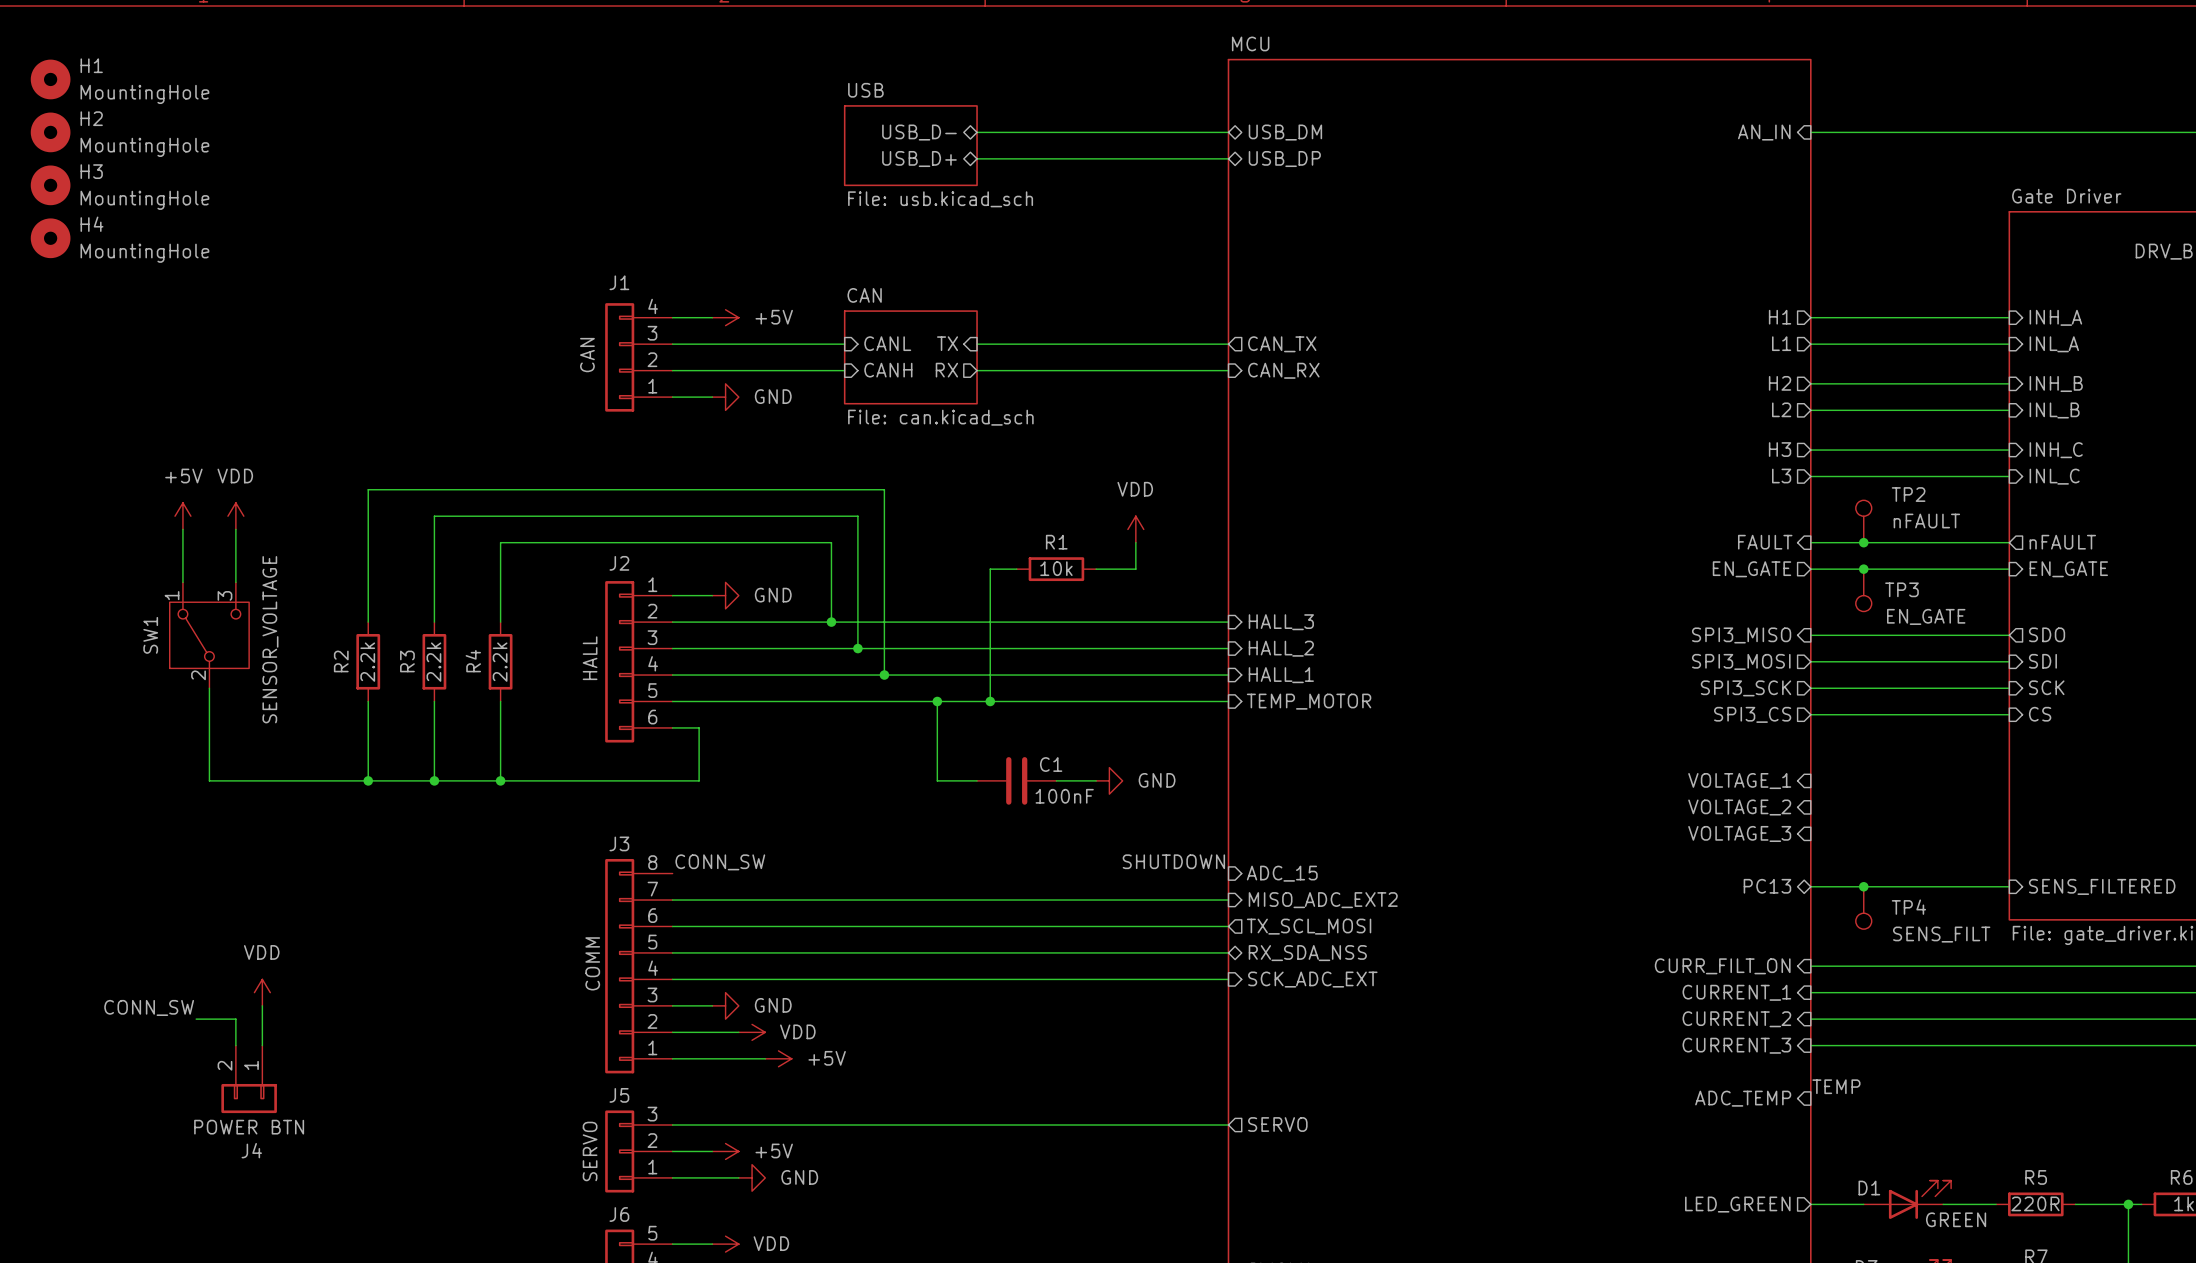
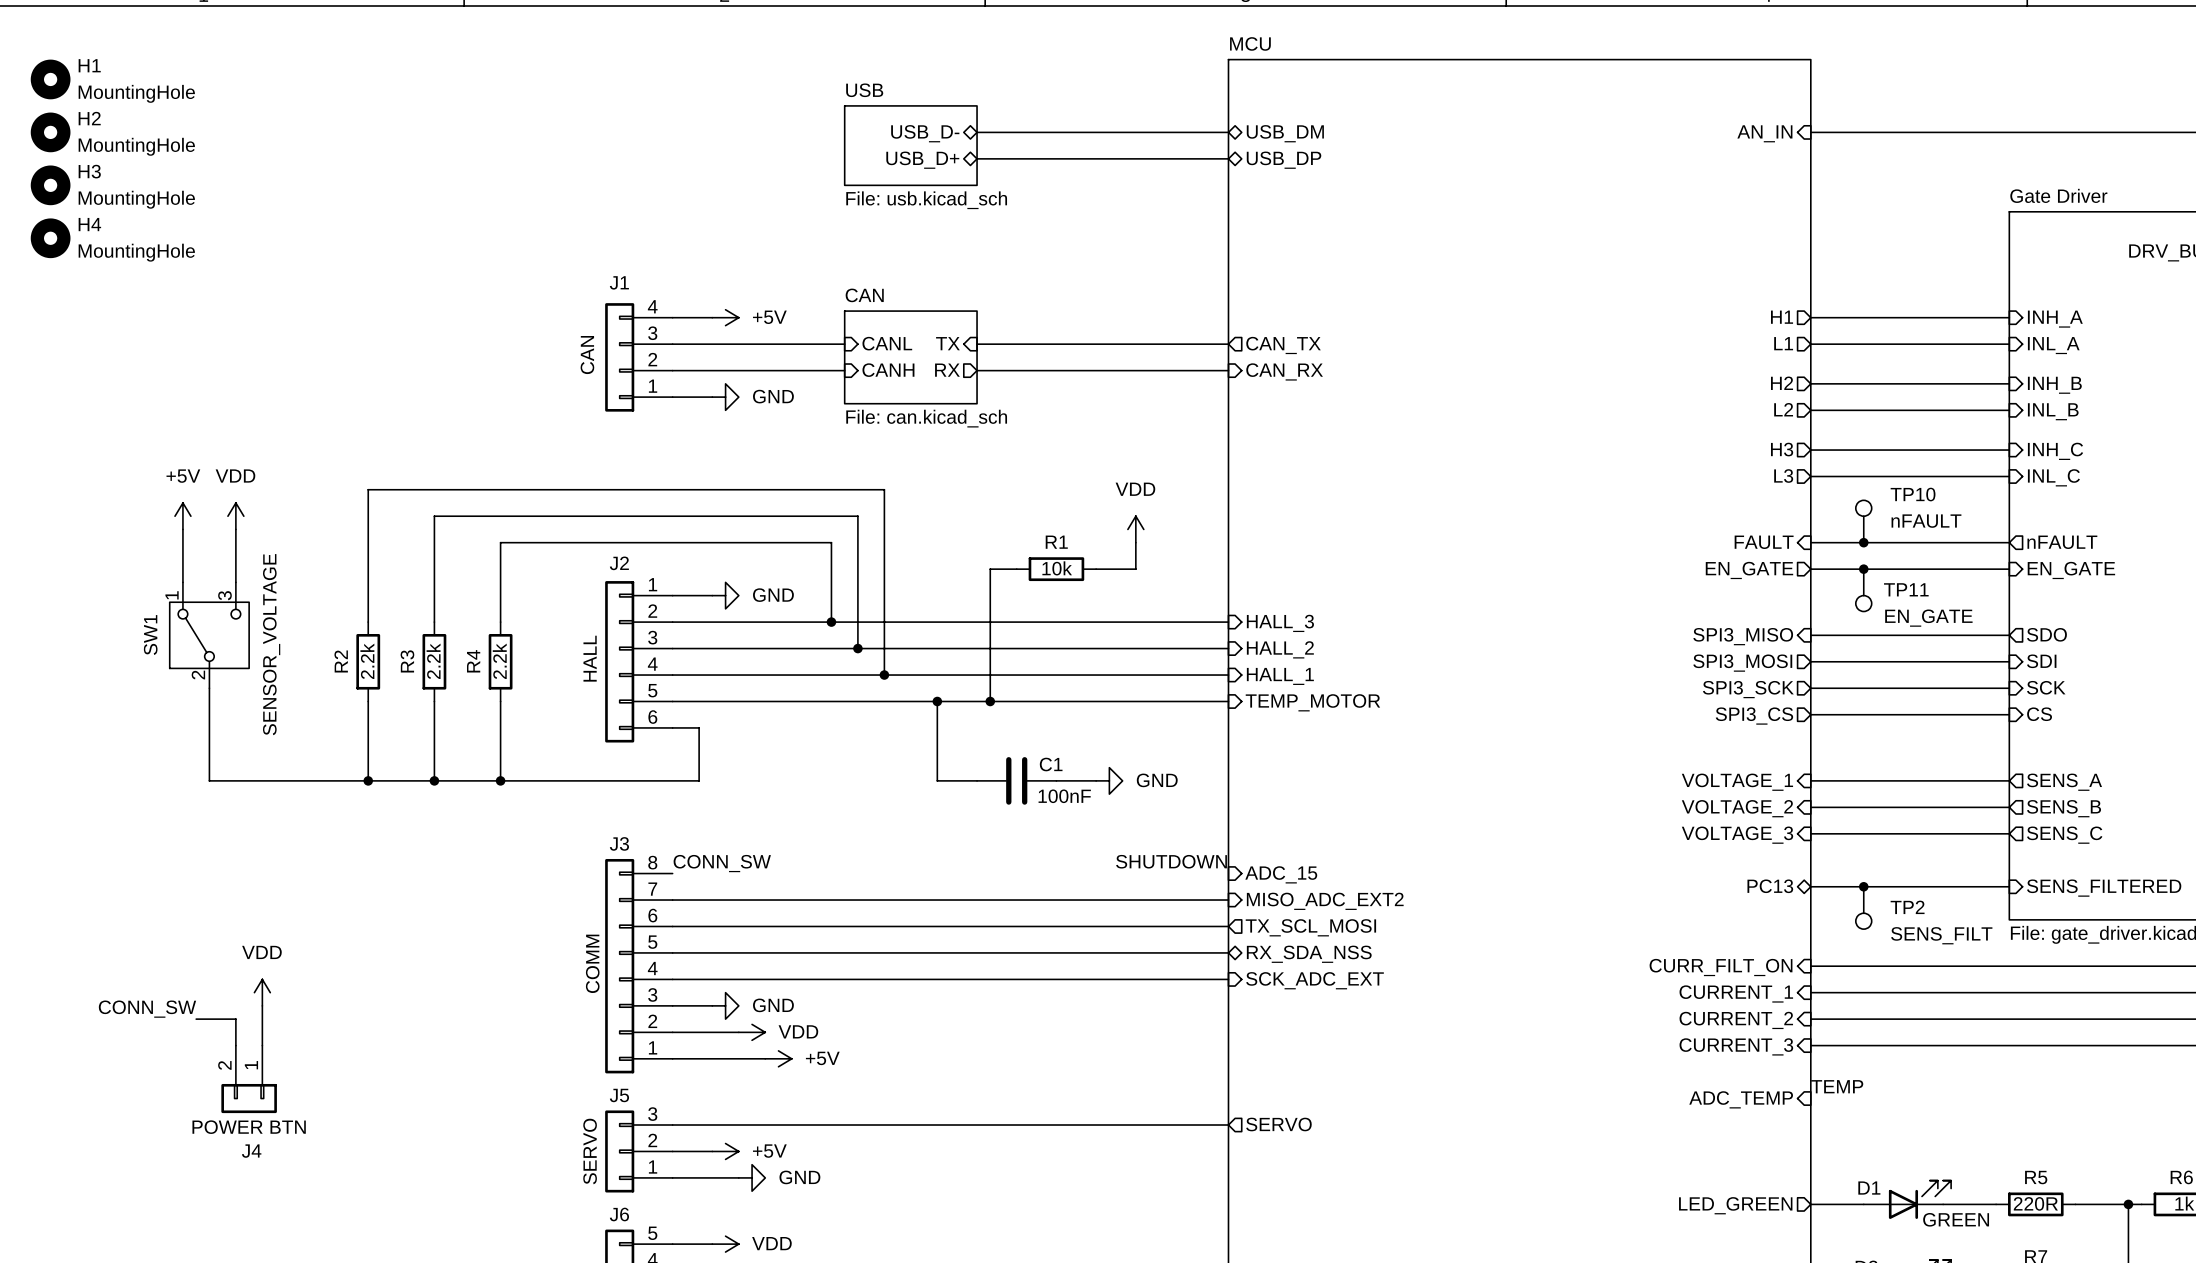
TP2 name: TP2 (1908, 494) -> TP10 (1913, 494)
TP3 name: TP3 (1901, 589) -> TP11 (1906, 589)
wire: none -> (1810, 780) (2009, 780)
sheet pin: none -> SENS_A (2064, 782)
wire: none -> (1810, 807) (2009, 807)
sheet pin: none -> SENS_B (2064, 808)
wire: none -> (1810, 833) (2009, 833)
sheet pin: none -> SENS_C (2064, 835)
TP4 name: TP4 (1908, 907) -> TP2 (1907, 907)

